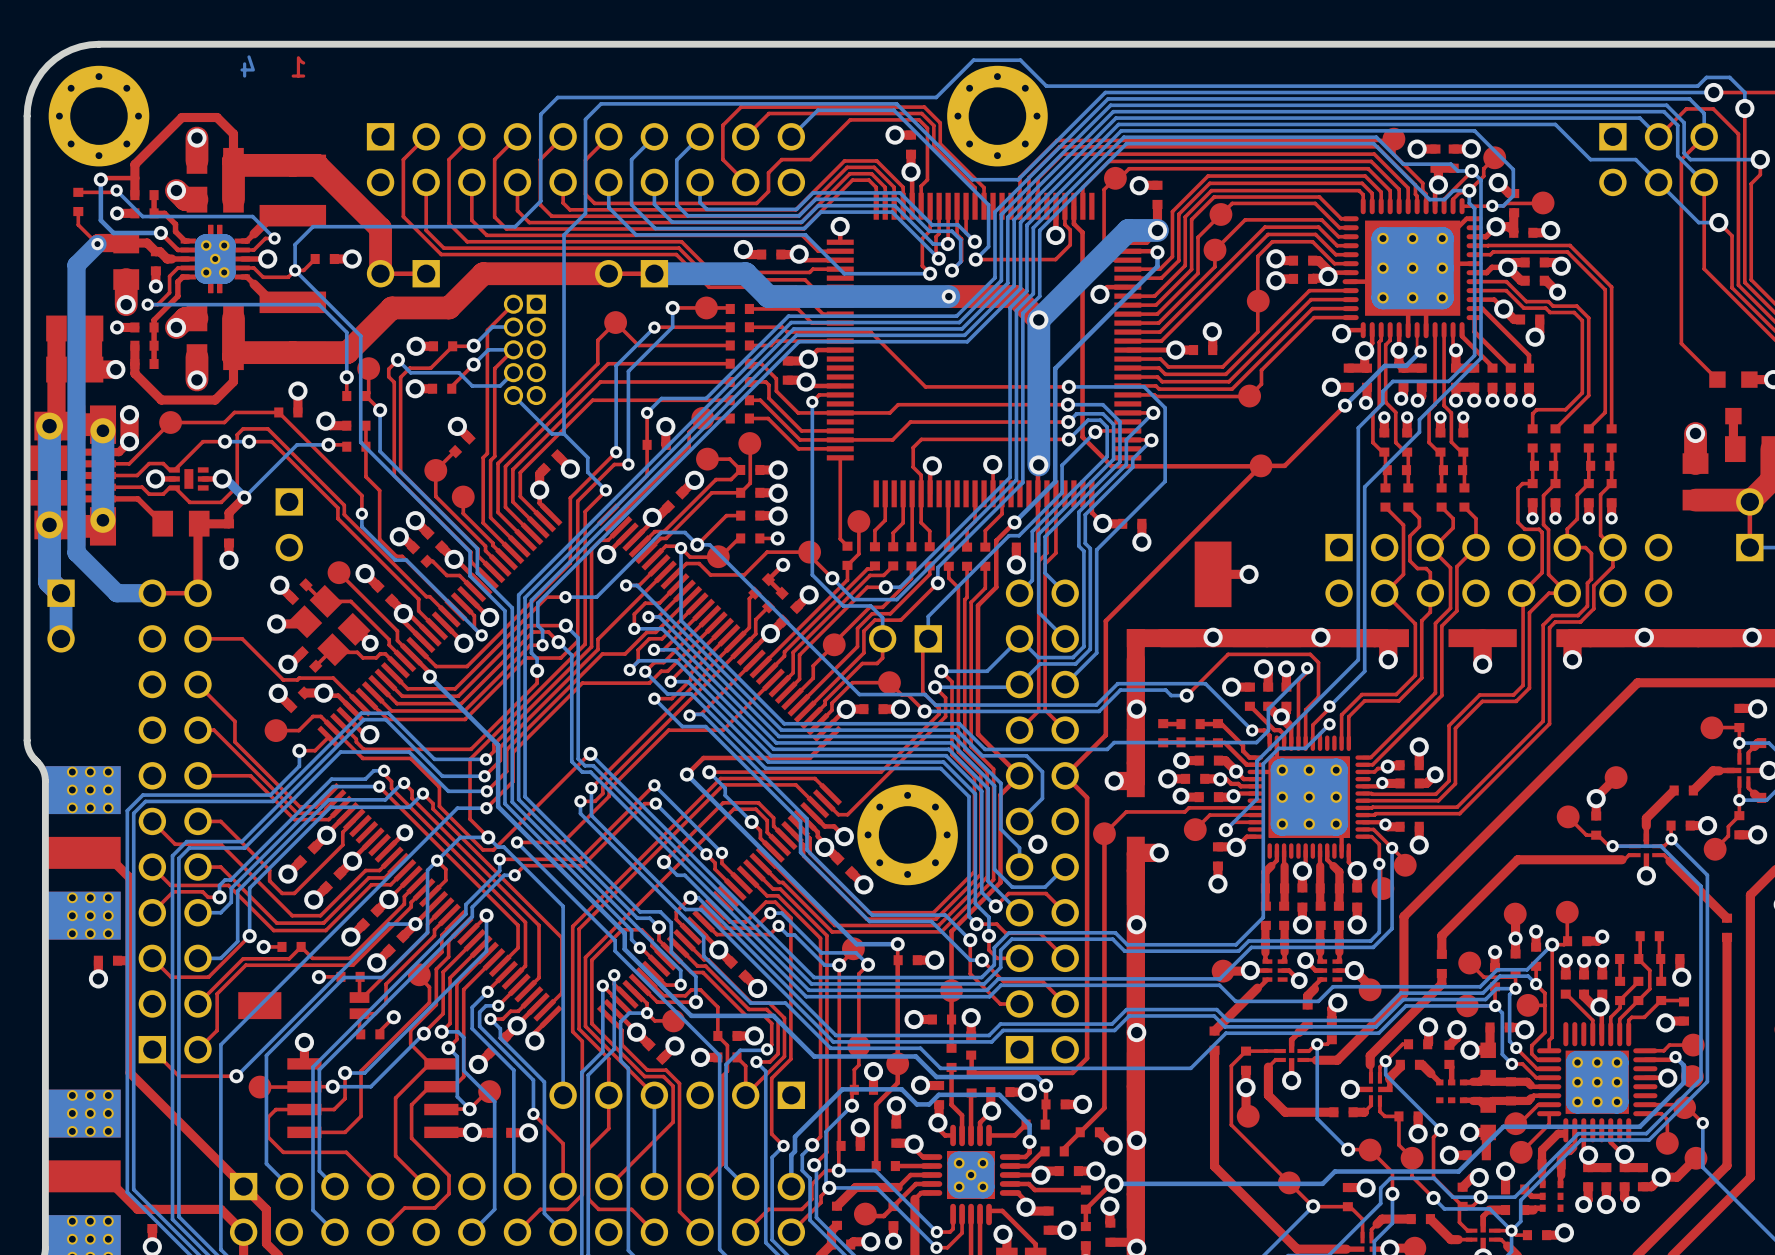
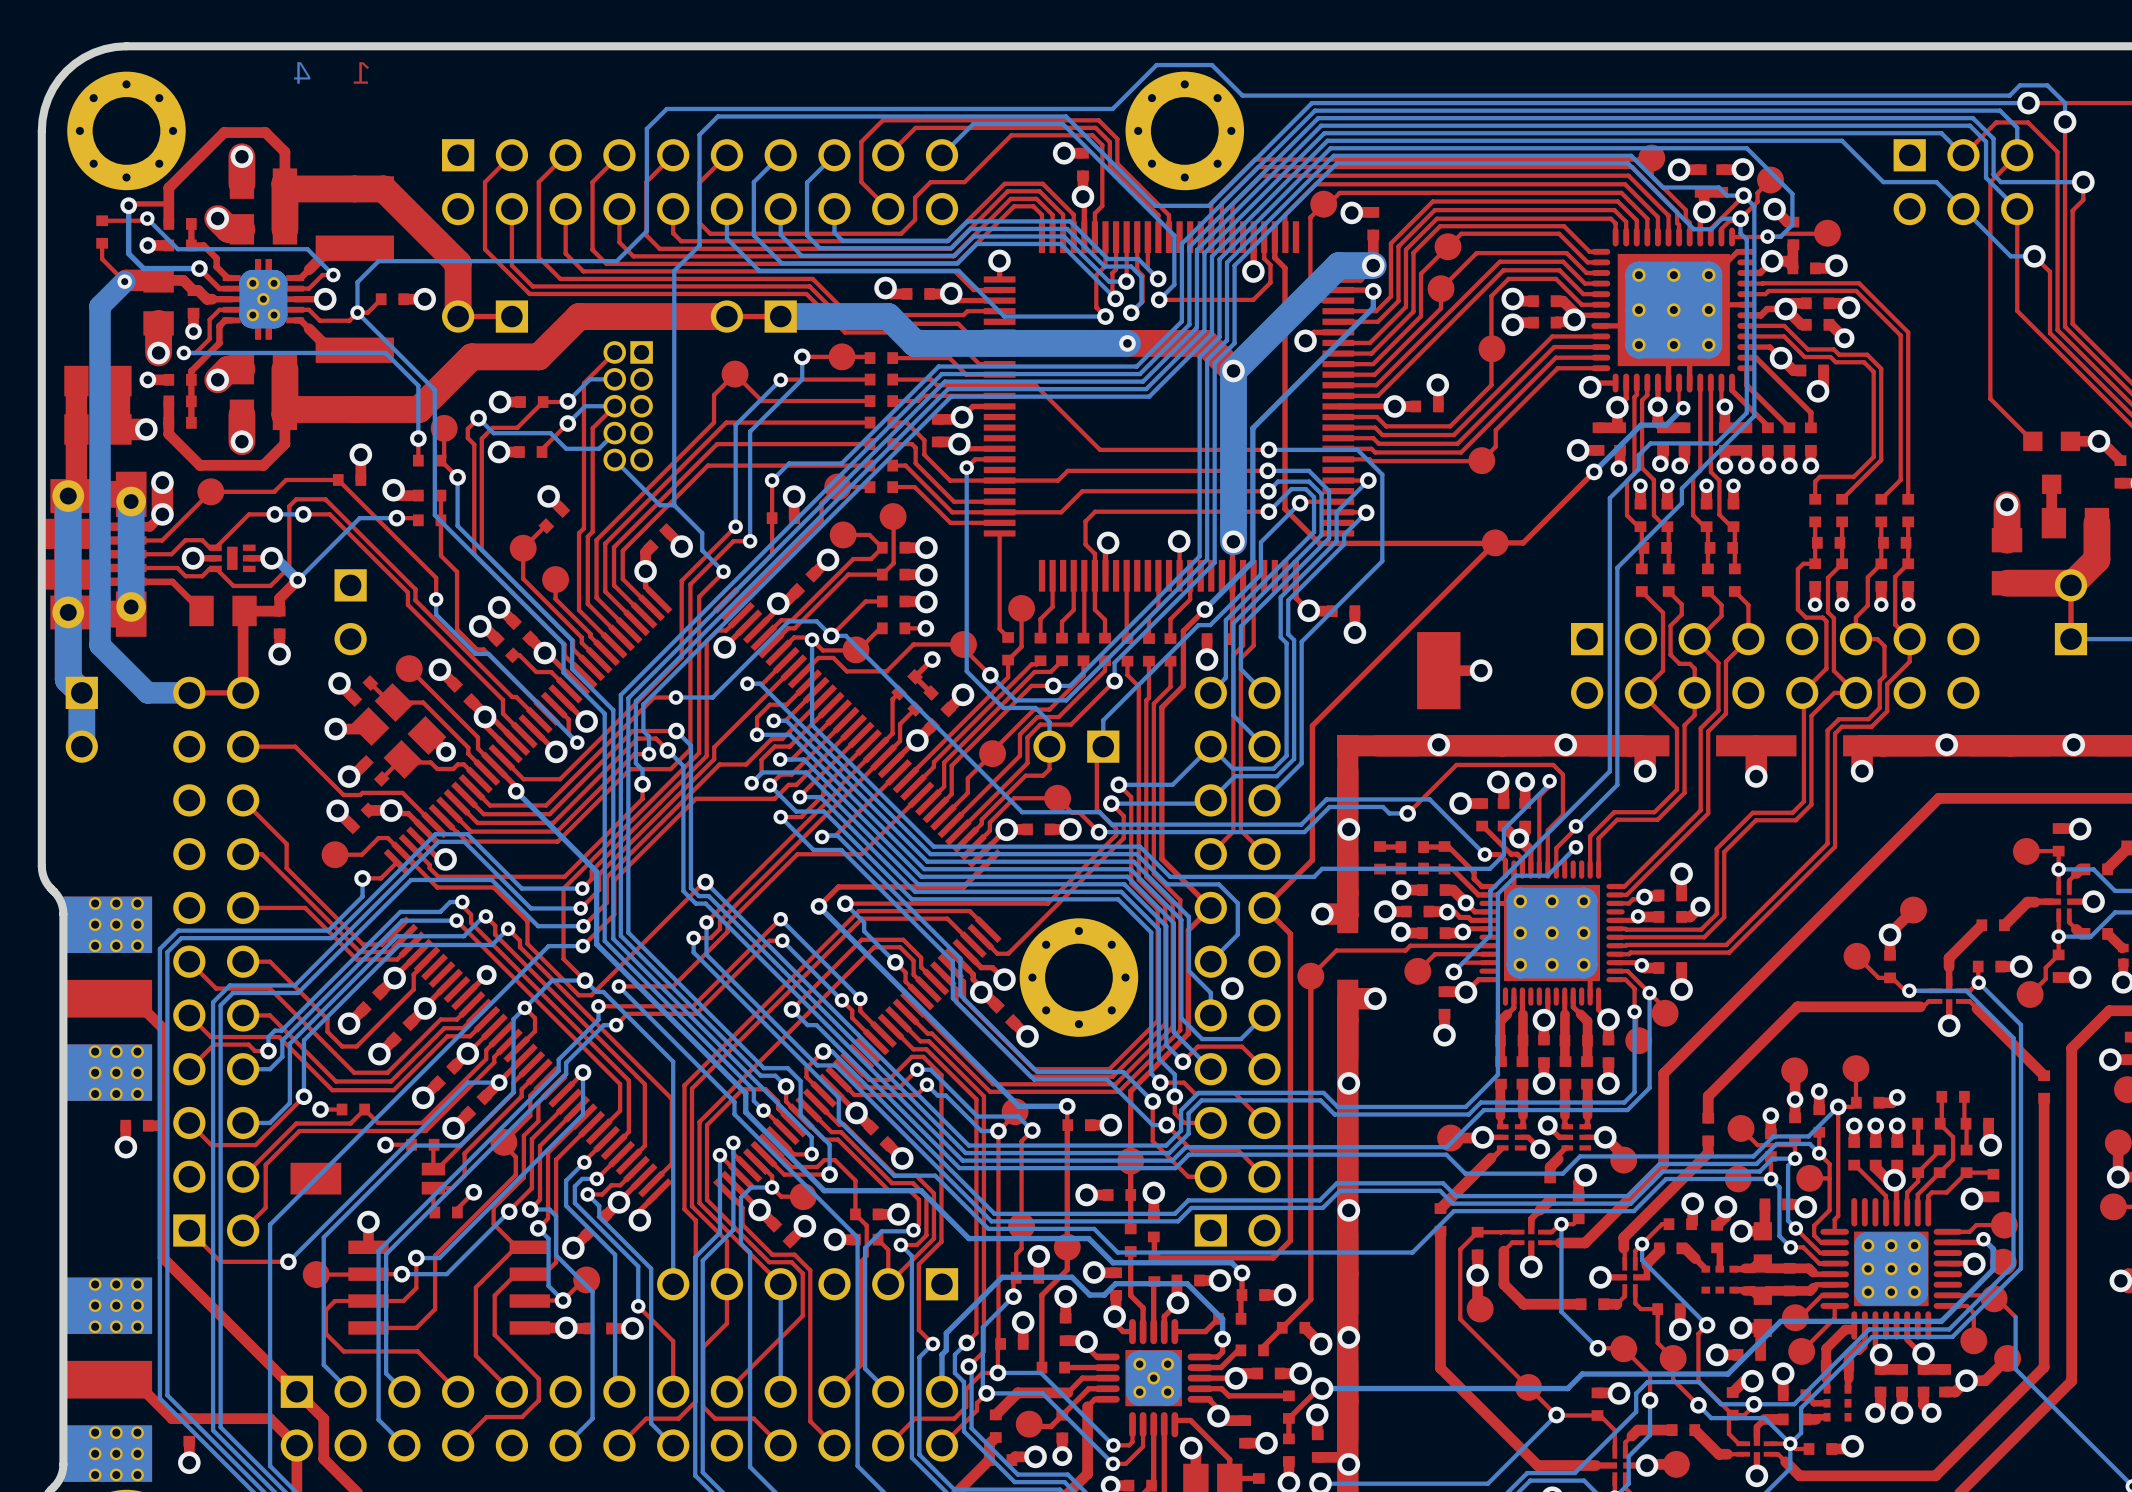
via: (1702, 1123) -> none

